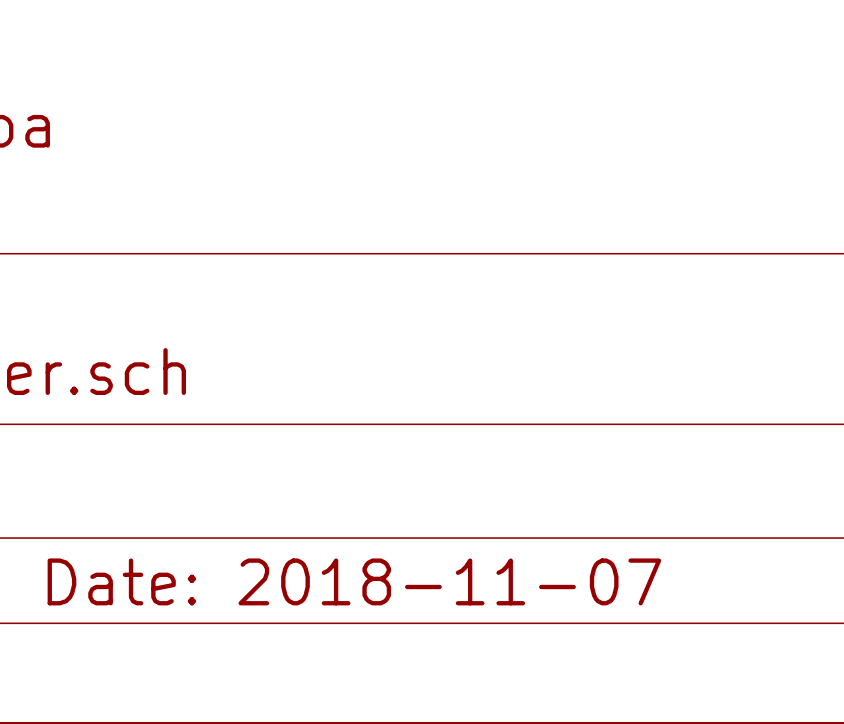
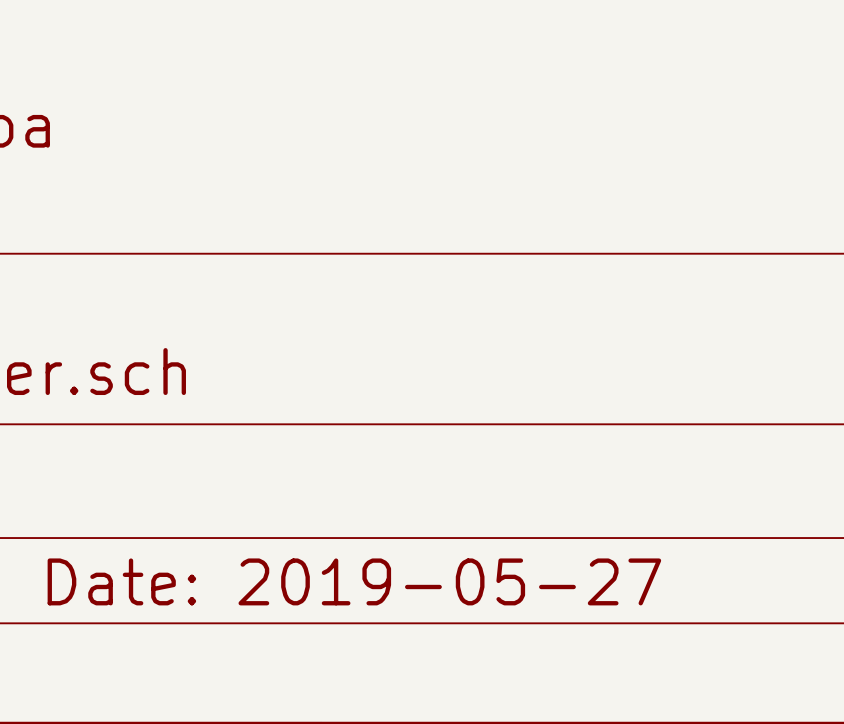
title block: Date: 2018-11-07 (354, 581) -> Date: 2019-05-27 (354, 581)

